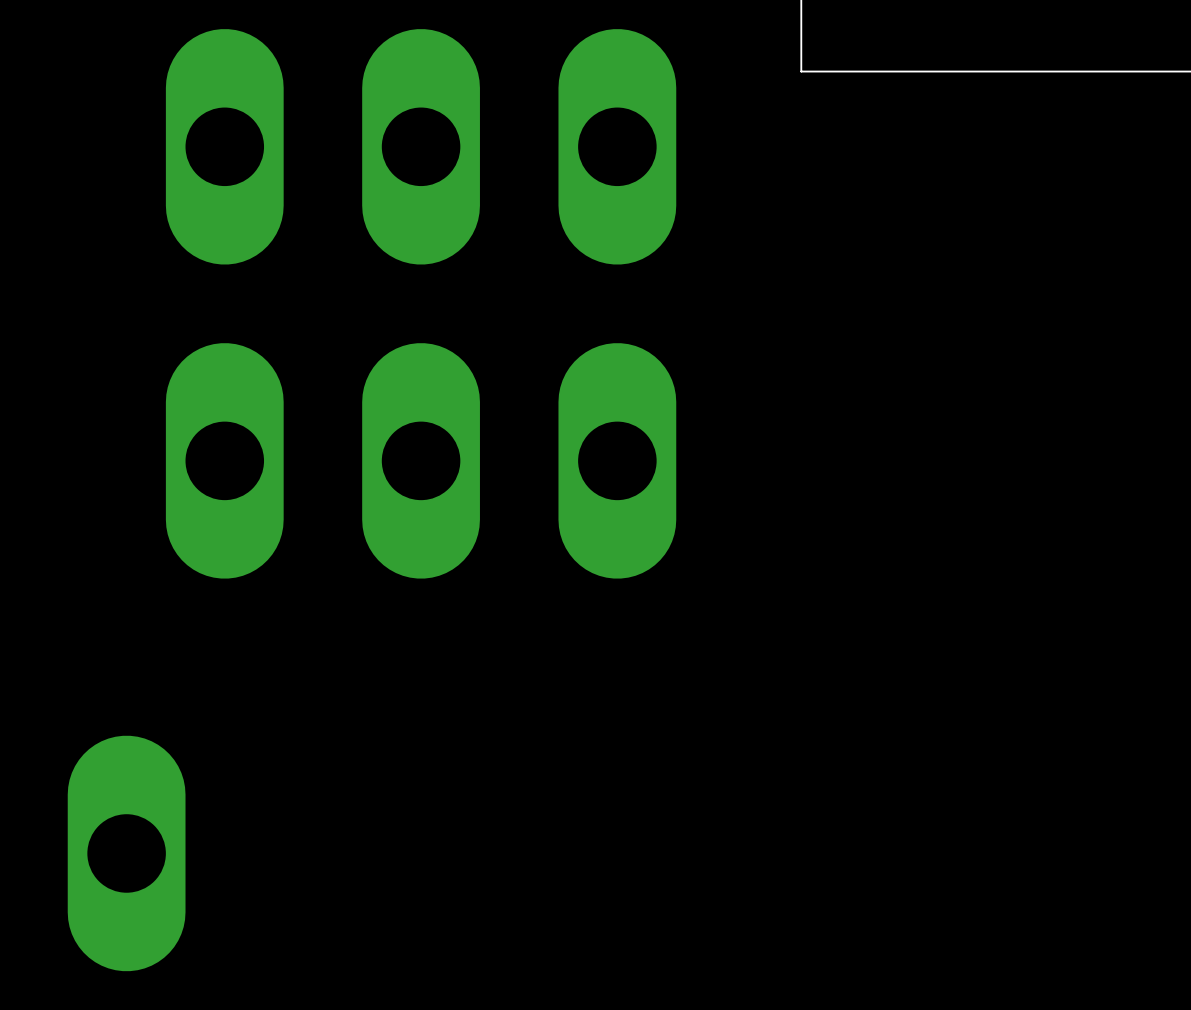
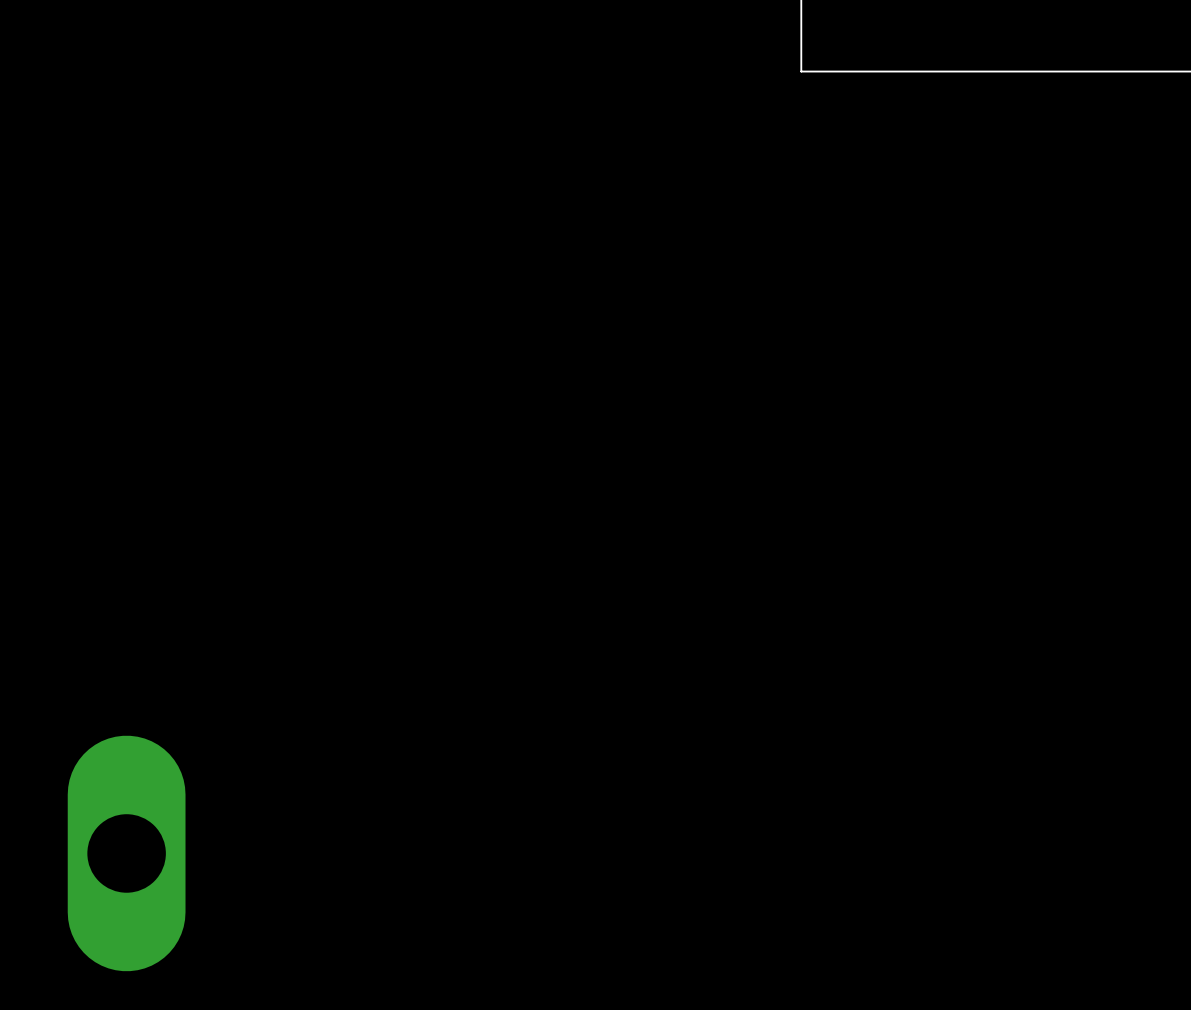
part: (421, 146) -> none
part: (421, 460) -> none

